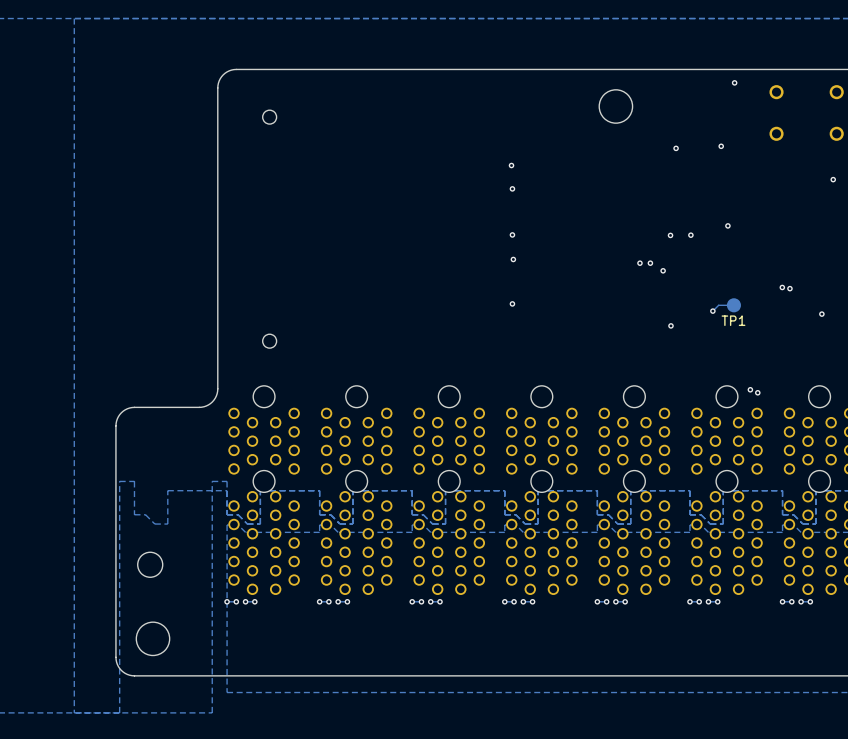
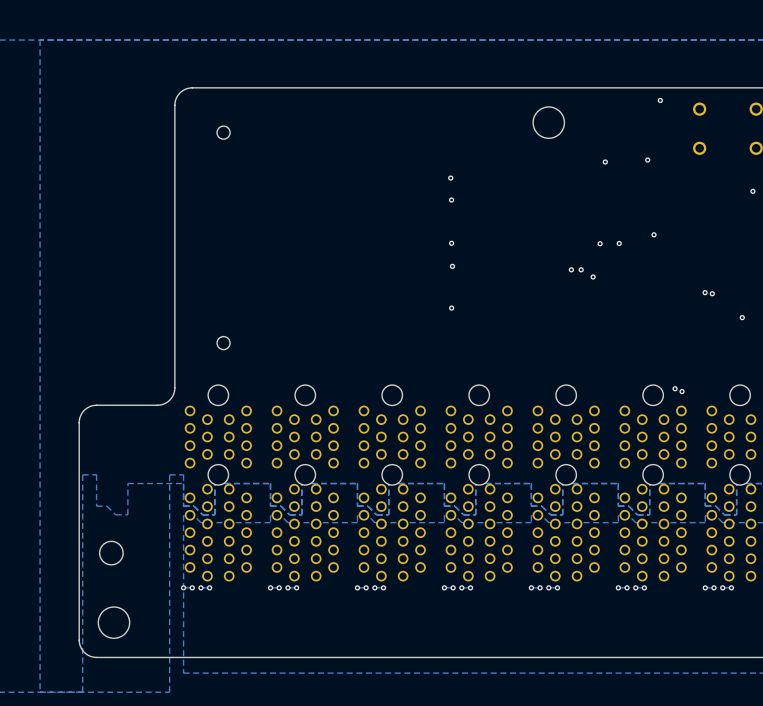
track: (733, 305) (718, 305) (712, 311) -> none
TP1: (733, 305) -> none
via: (712, 311) -> none
via: (670, 325) -> none

